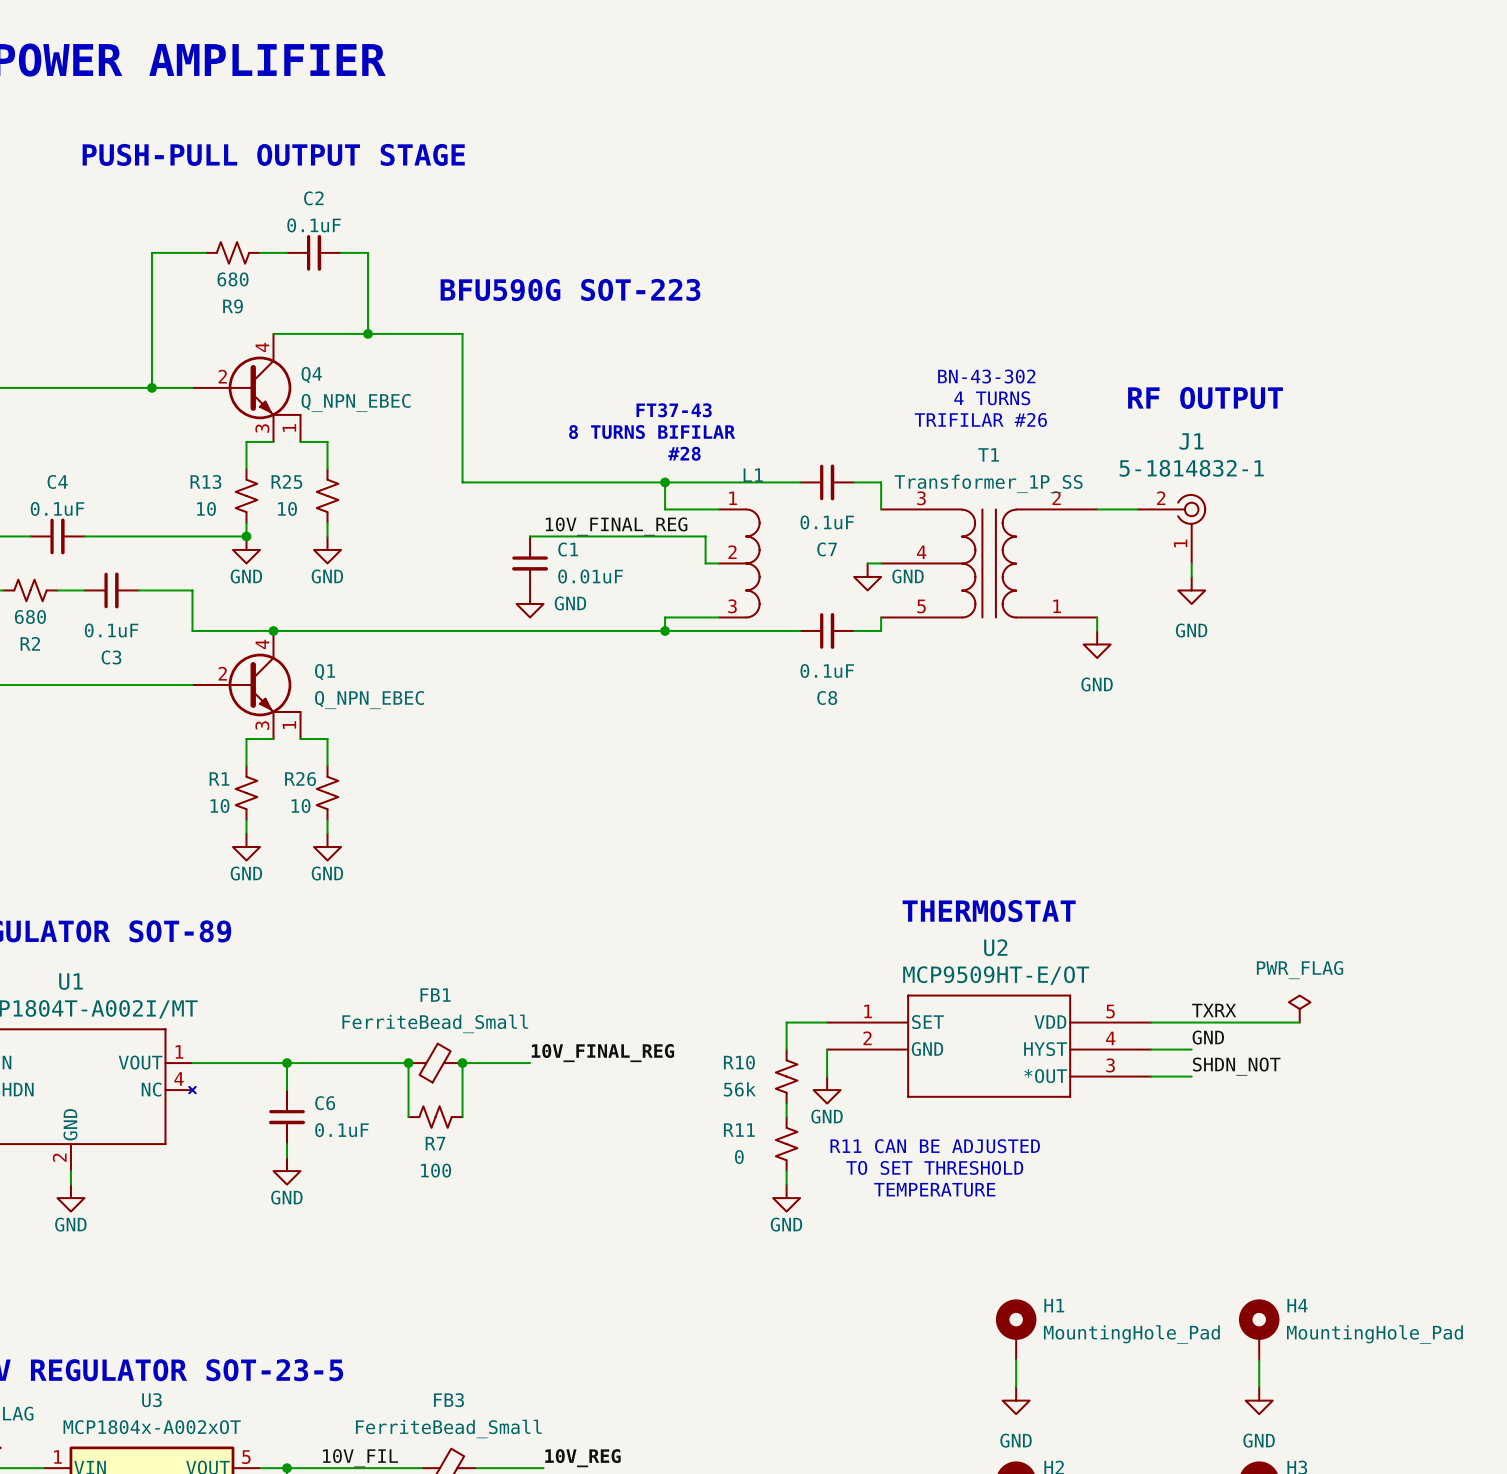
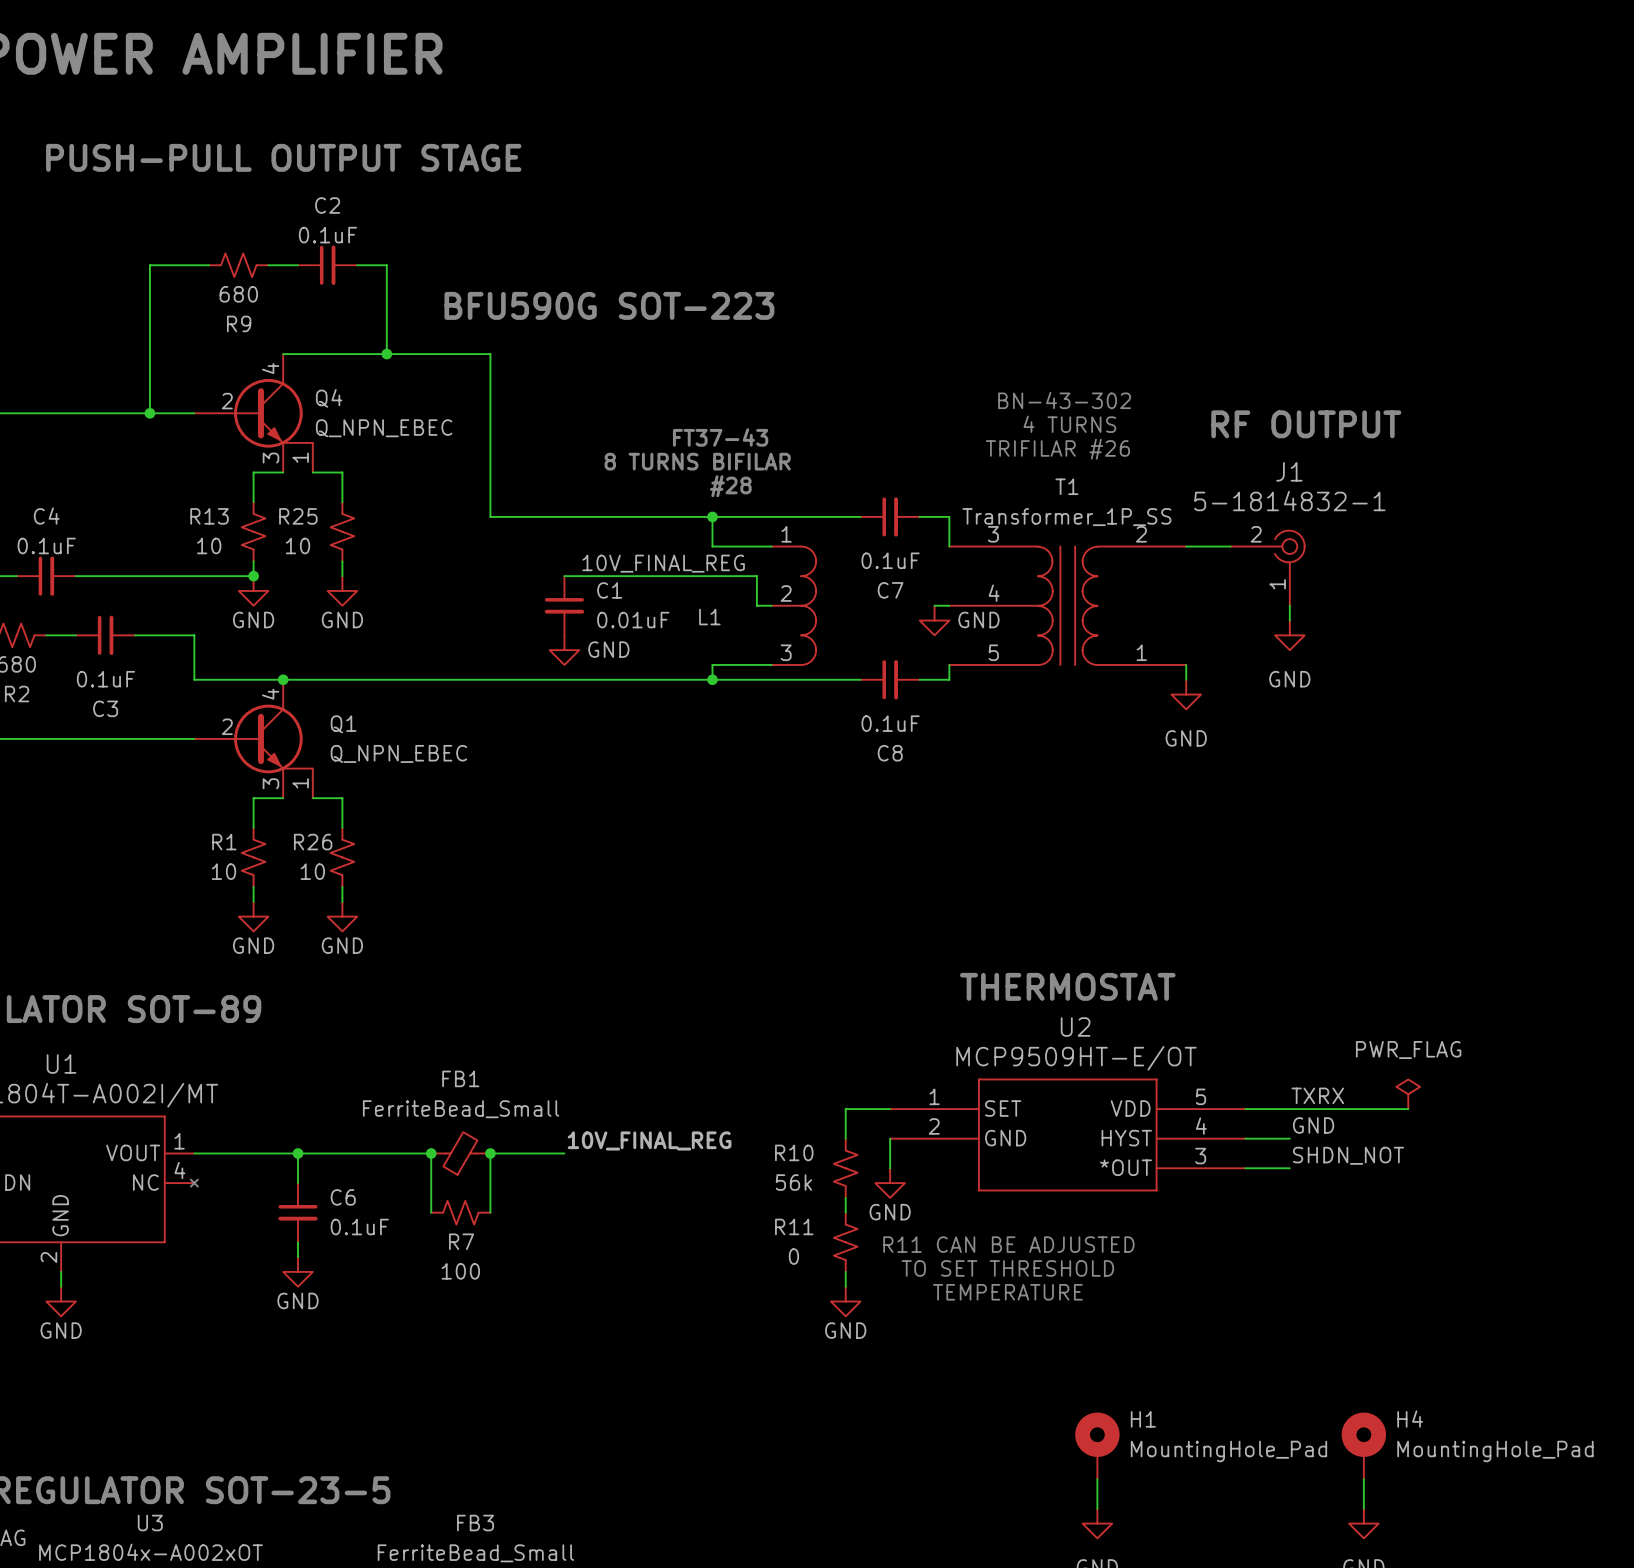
L1 name position: L1 (753, 475) -> L1 (709, 617)

